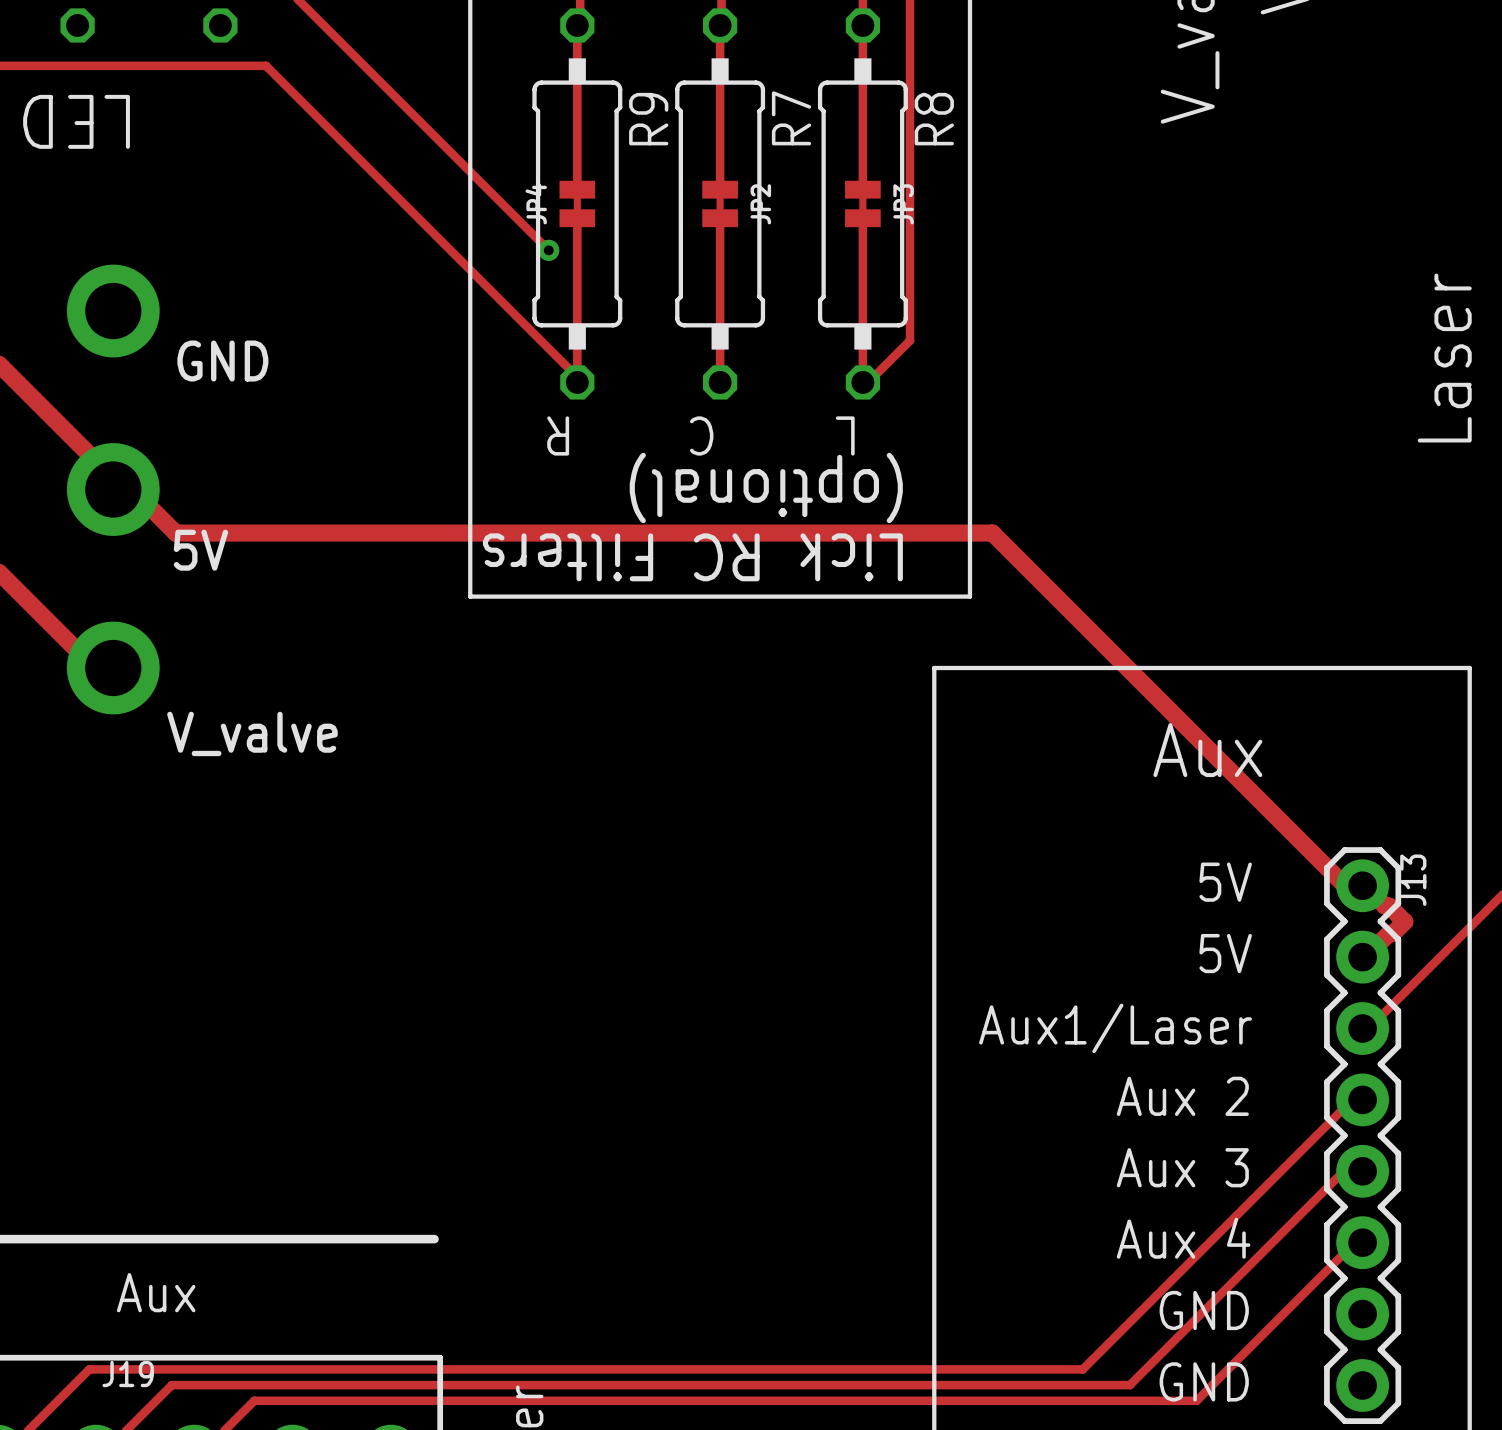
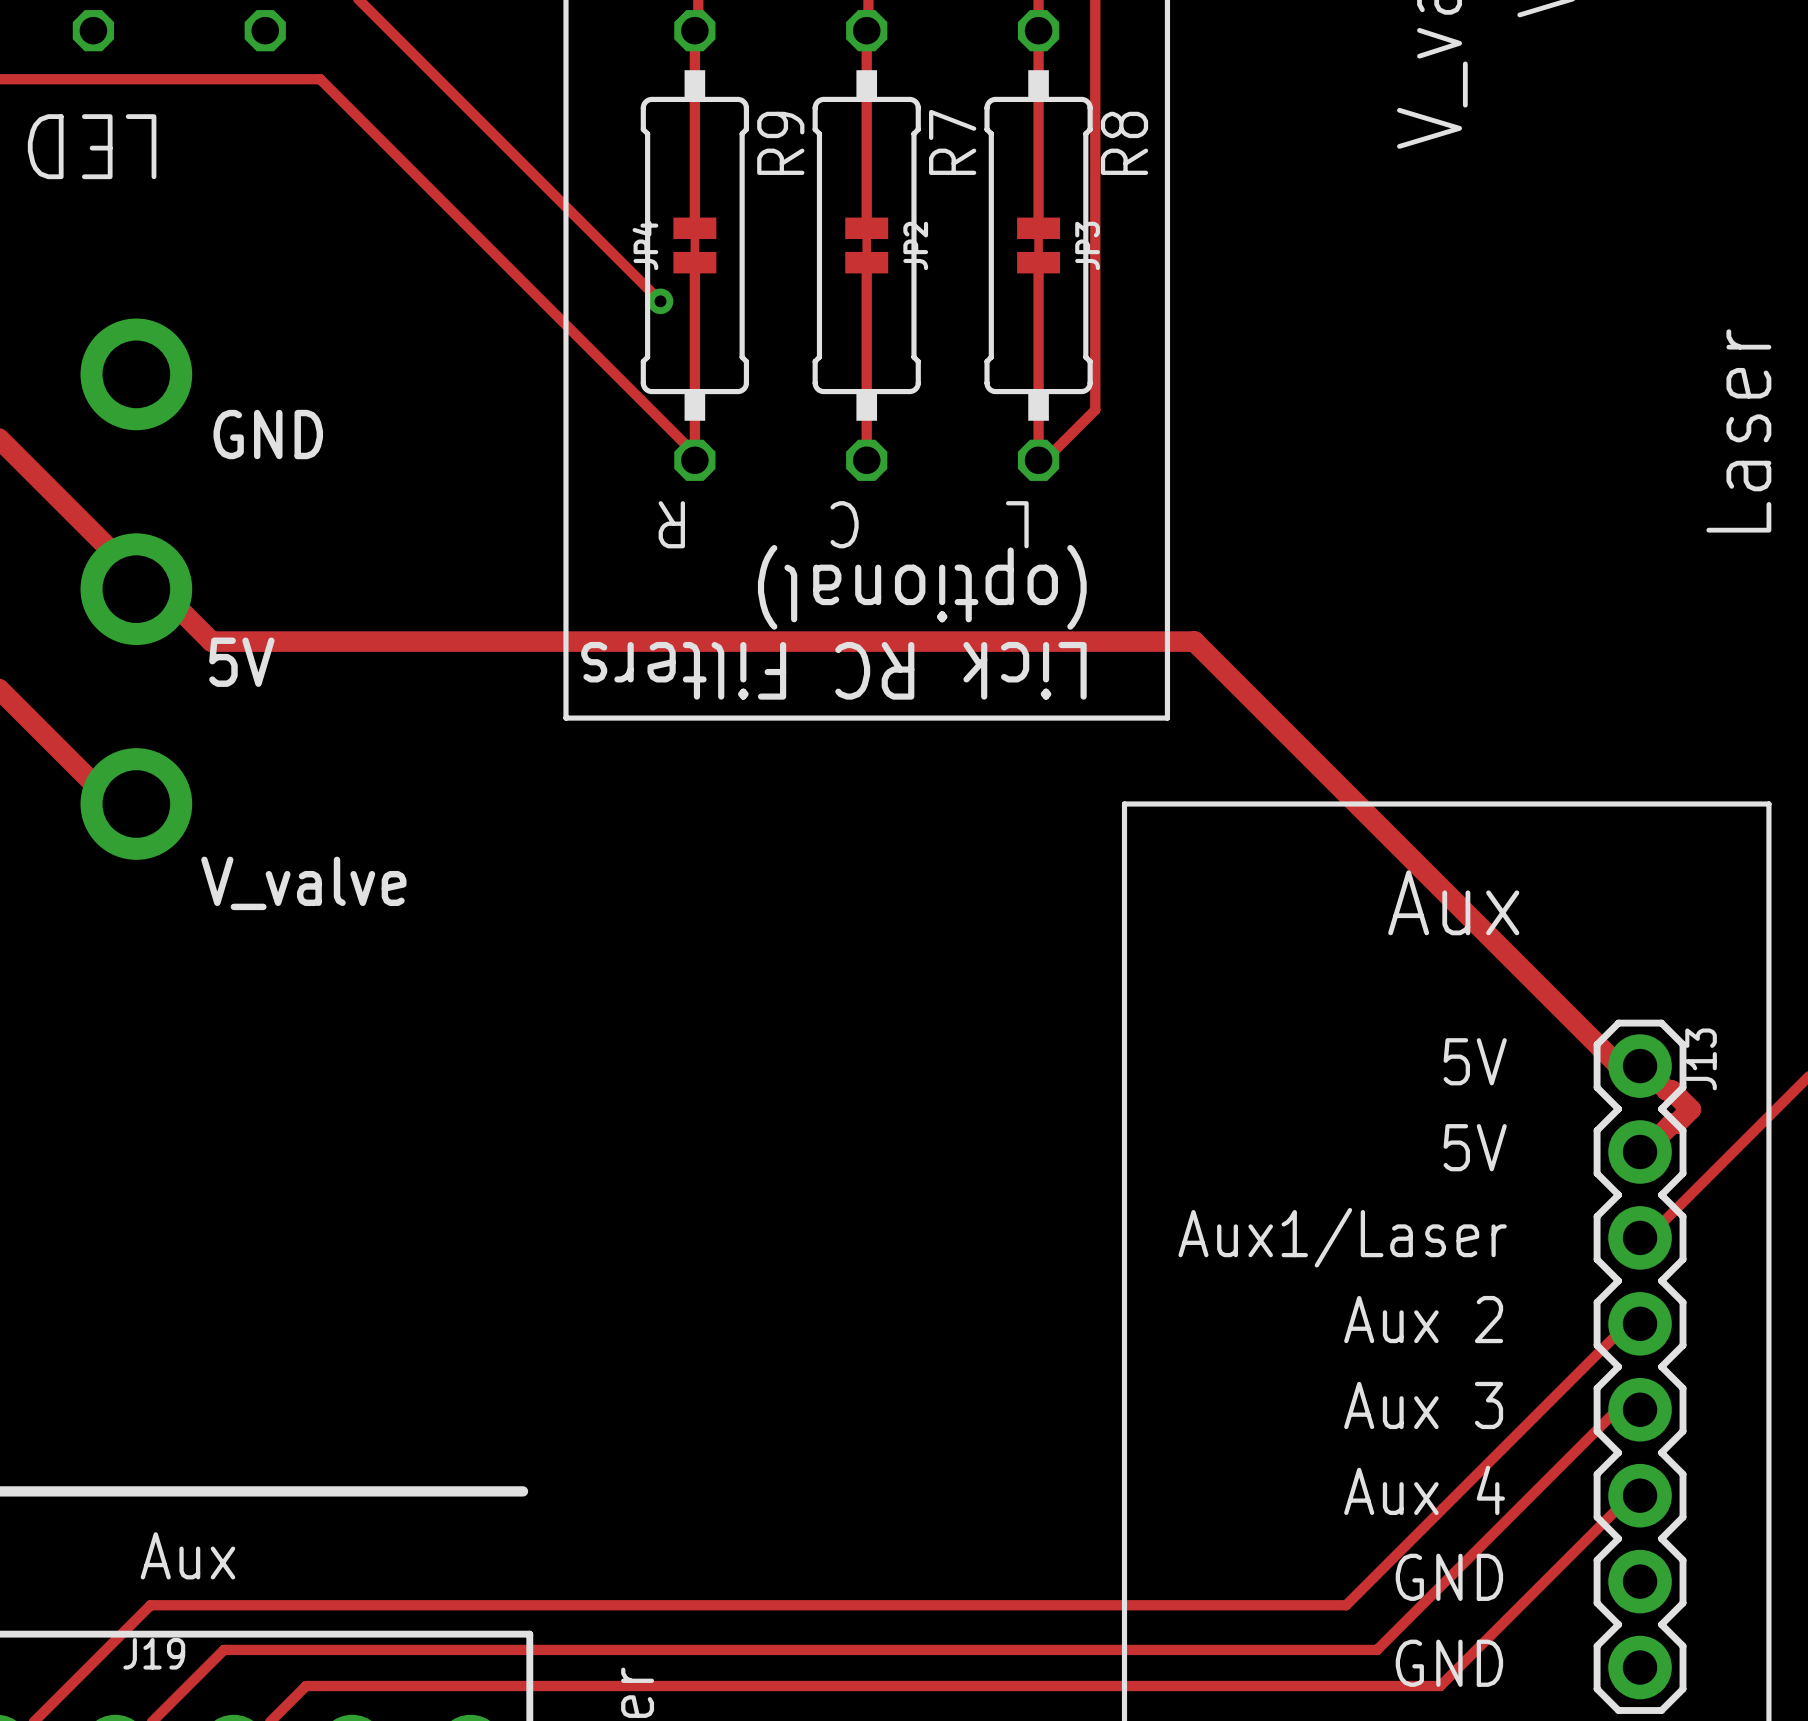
track: (1118, 1333) (1082, 1369) (89, 1369) -> (1346, 1605) (150, 1605) (107, 1648)
track: (1144, 1370) (1129, 1385) (171, 1385) -> (1377, 1649) (224, 1649) (206, 1667)

